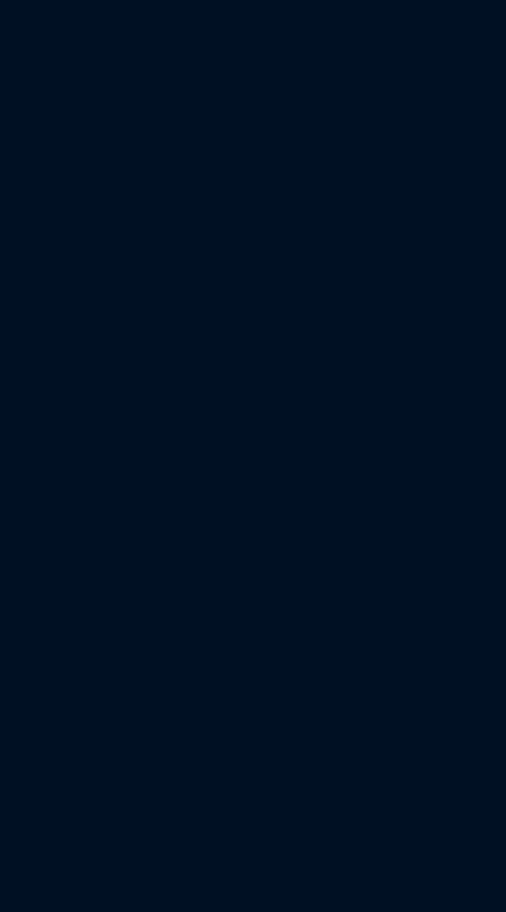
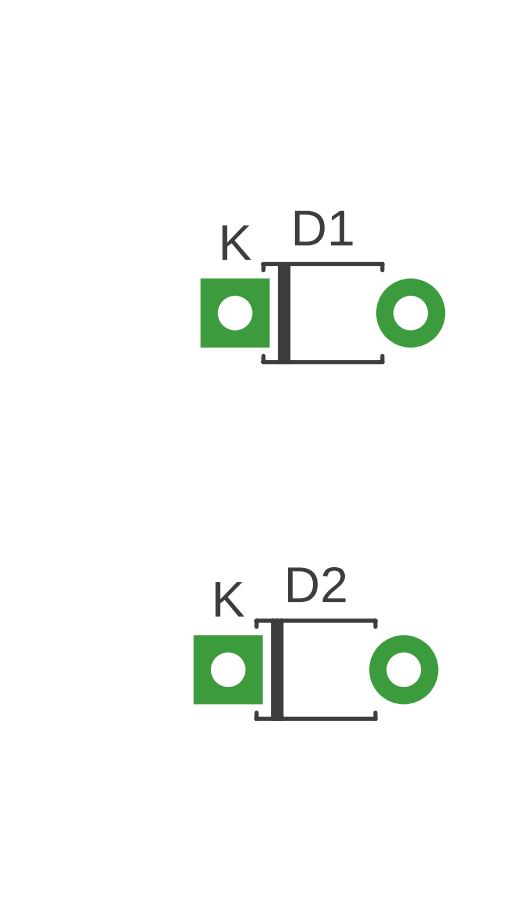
D1: none -> (322, 313)
D2: none -> (315, 669)

